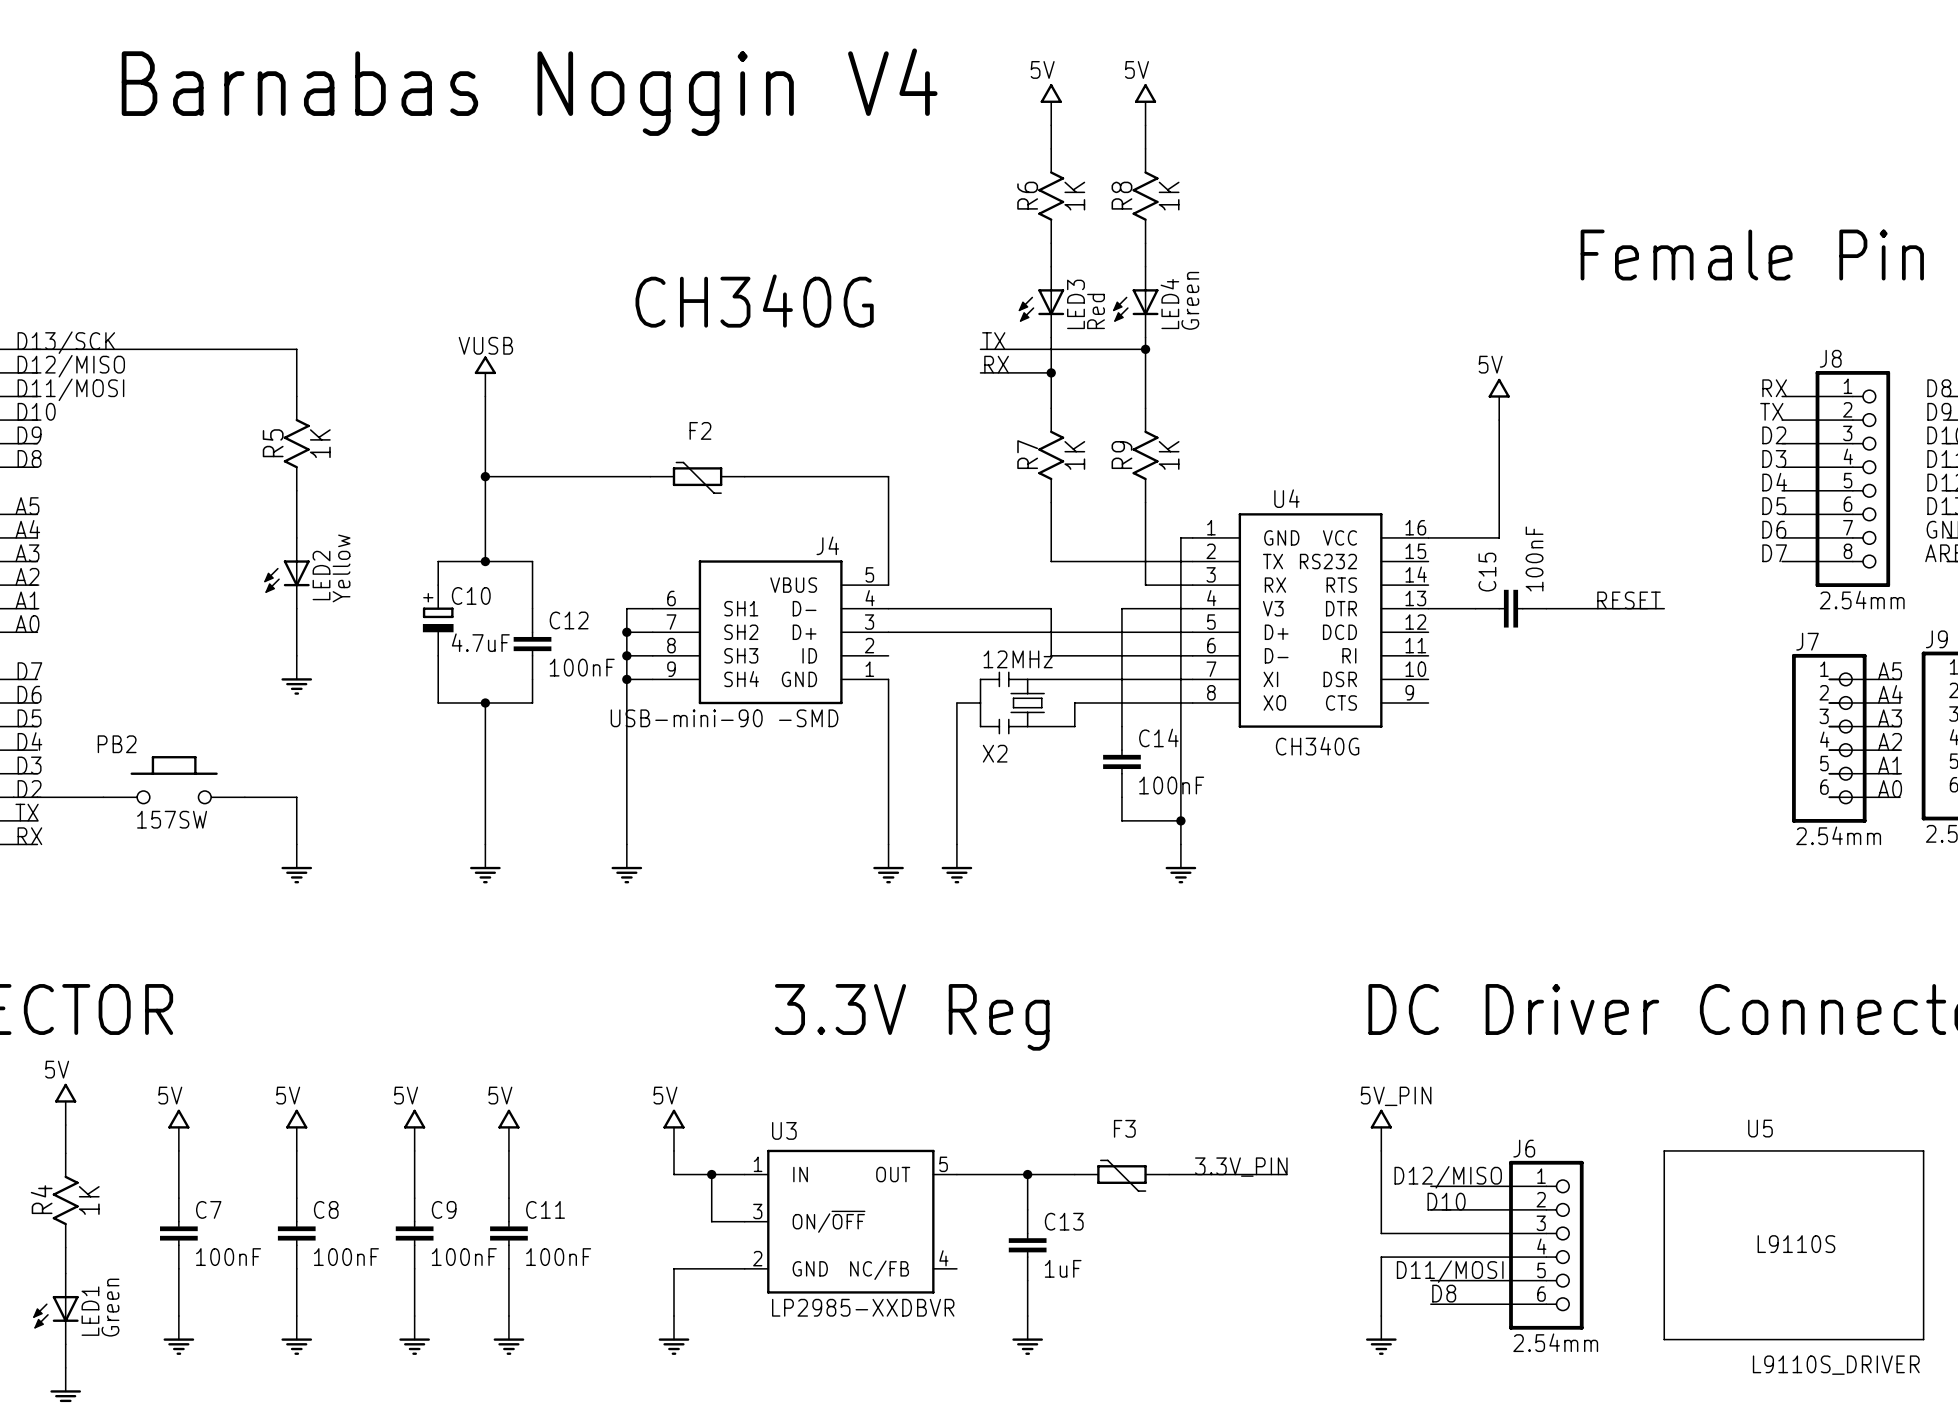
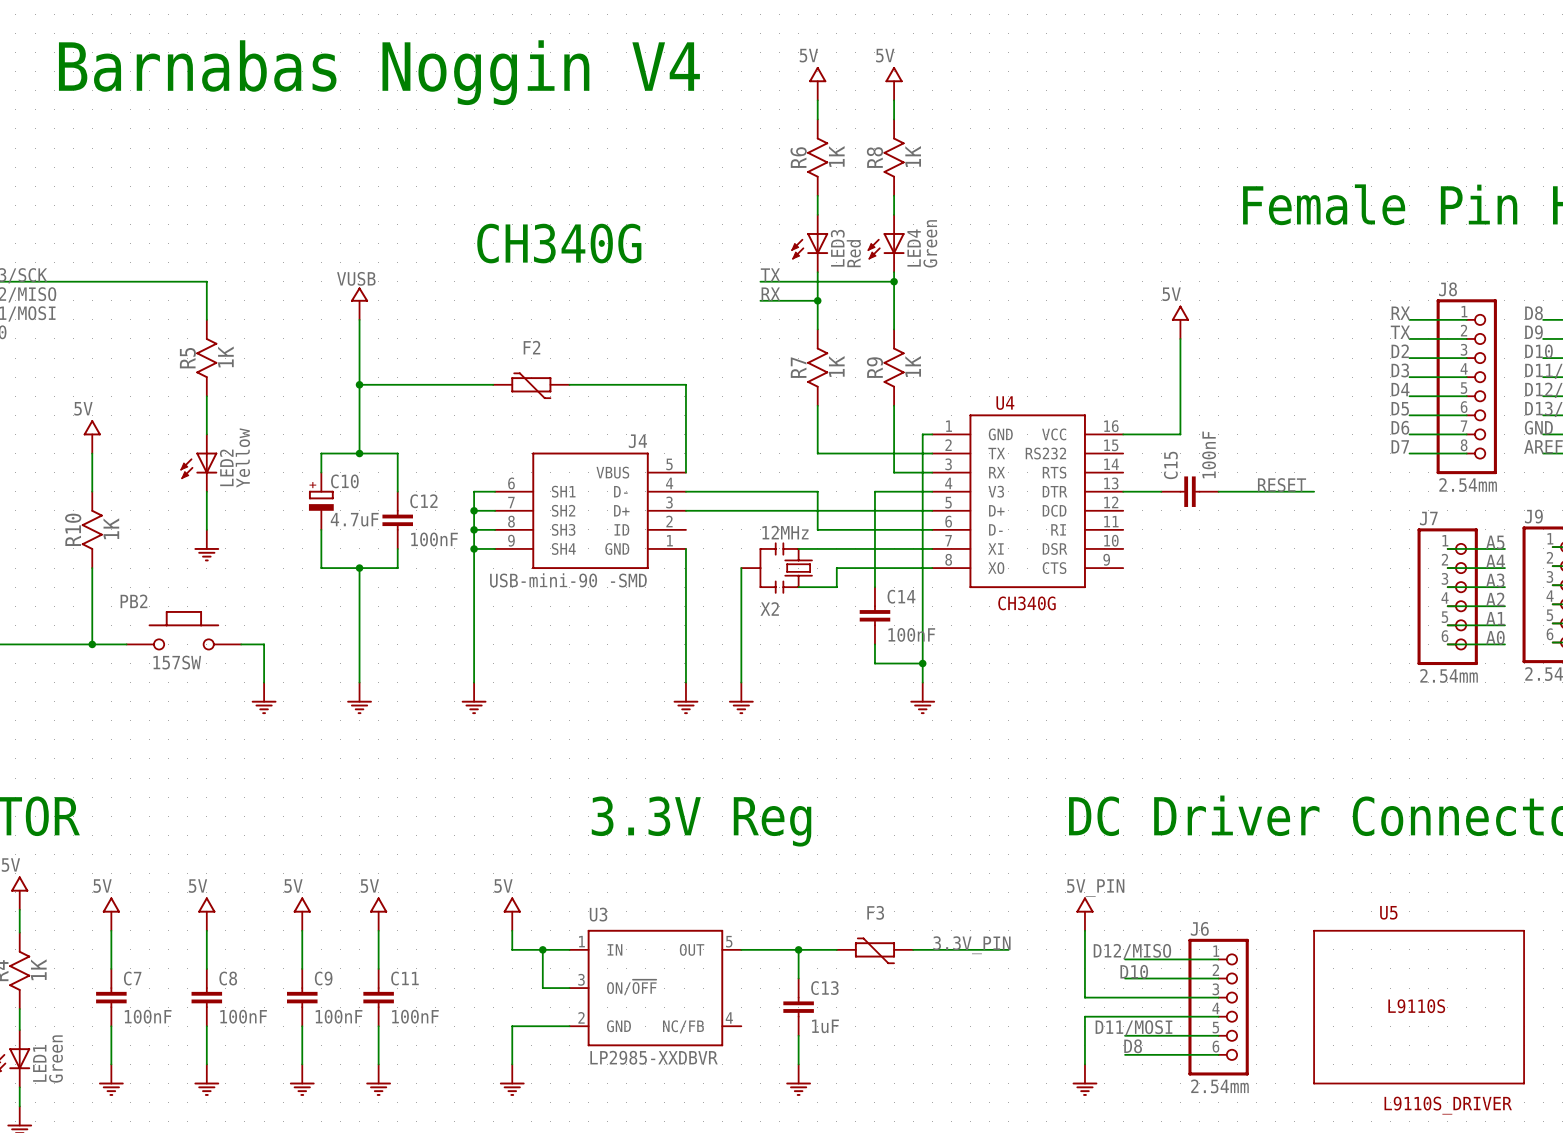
power symbol: none -> 5V (92, 436)
wire: none -> (92, 453) (92, 491)
R10: none -> 1K (92, 529)
wire: none -> (92, 568) (92, 644)
PB2 position: (174, 779) -> (183, 630)
wire: none -> (50, 644) (126, 644)
junction: none -> (92, 644)
wire: (244, 797) (296, 797) (296, 844) -> none
wire: none -> (241, 644) (264, 644) (264, 682)
power symbol position: (296, 863) -> (264, 698)

